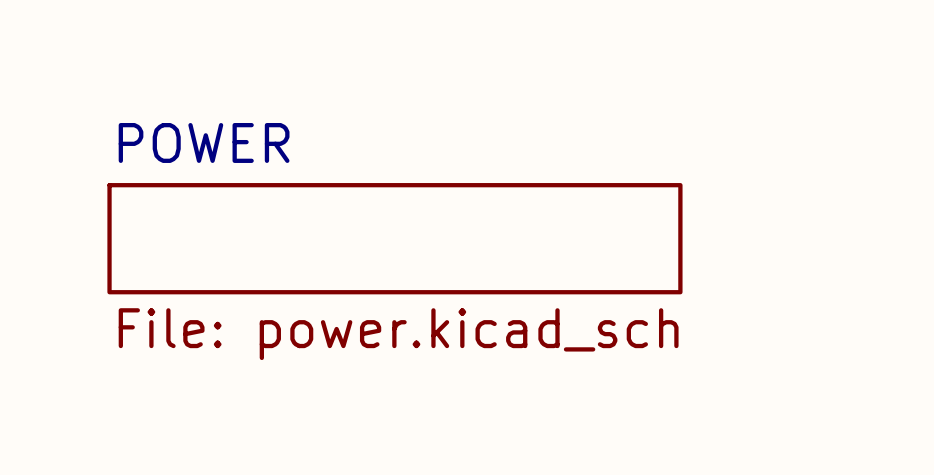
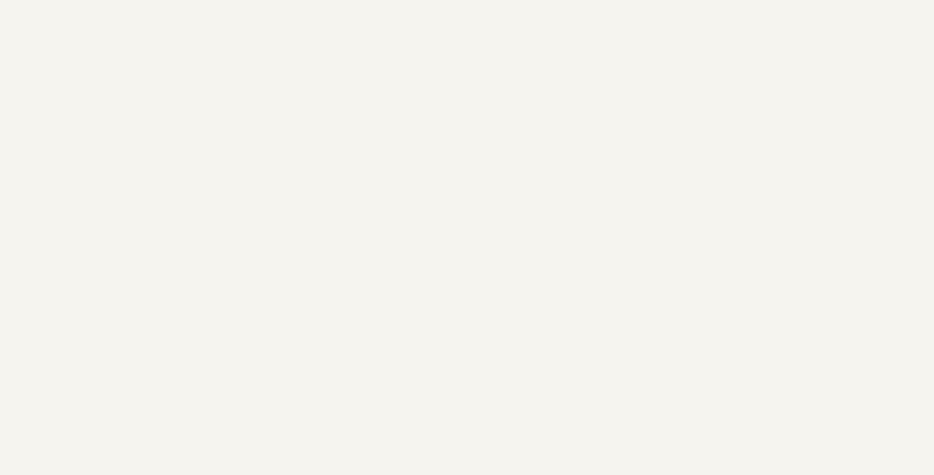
sheet POWER: File: power.kicad_sch (394, 238) -> none

